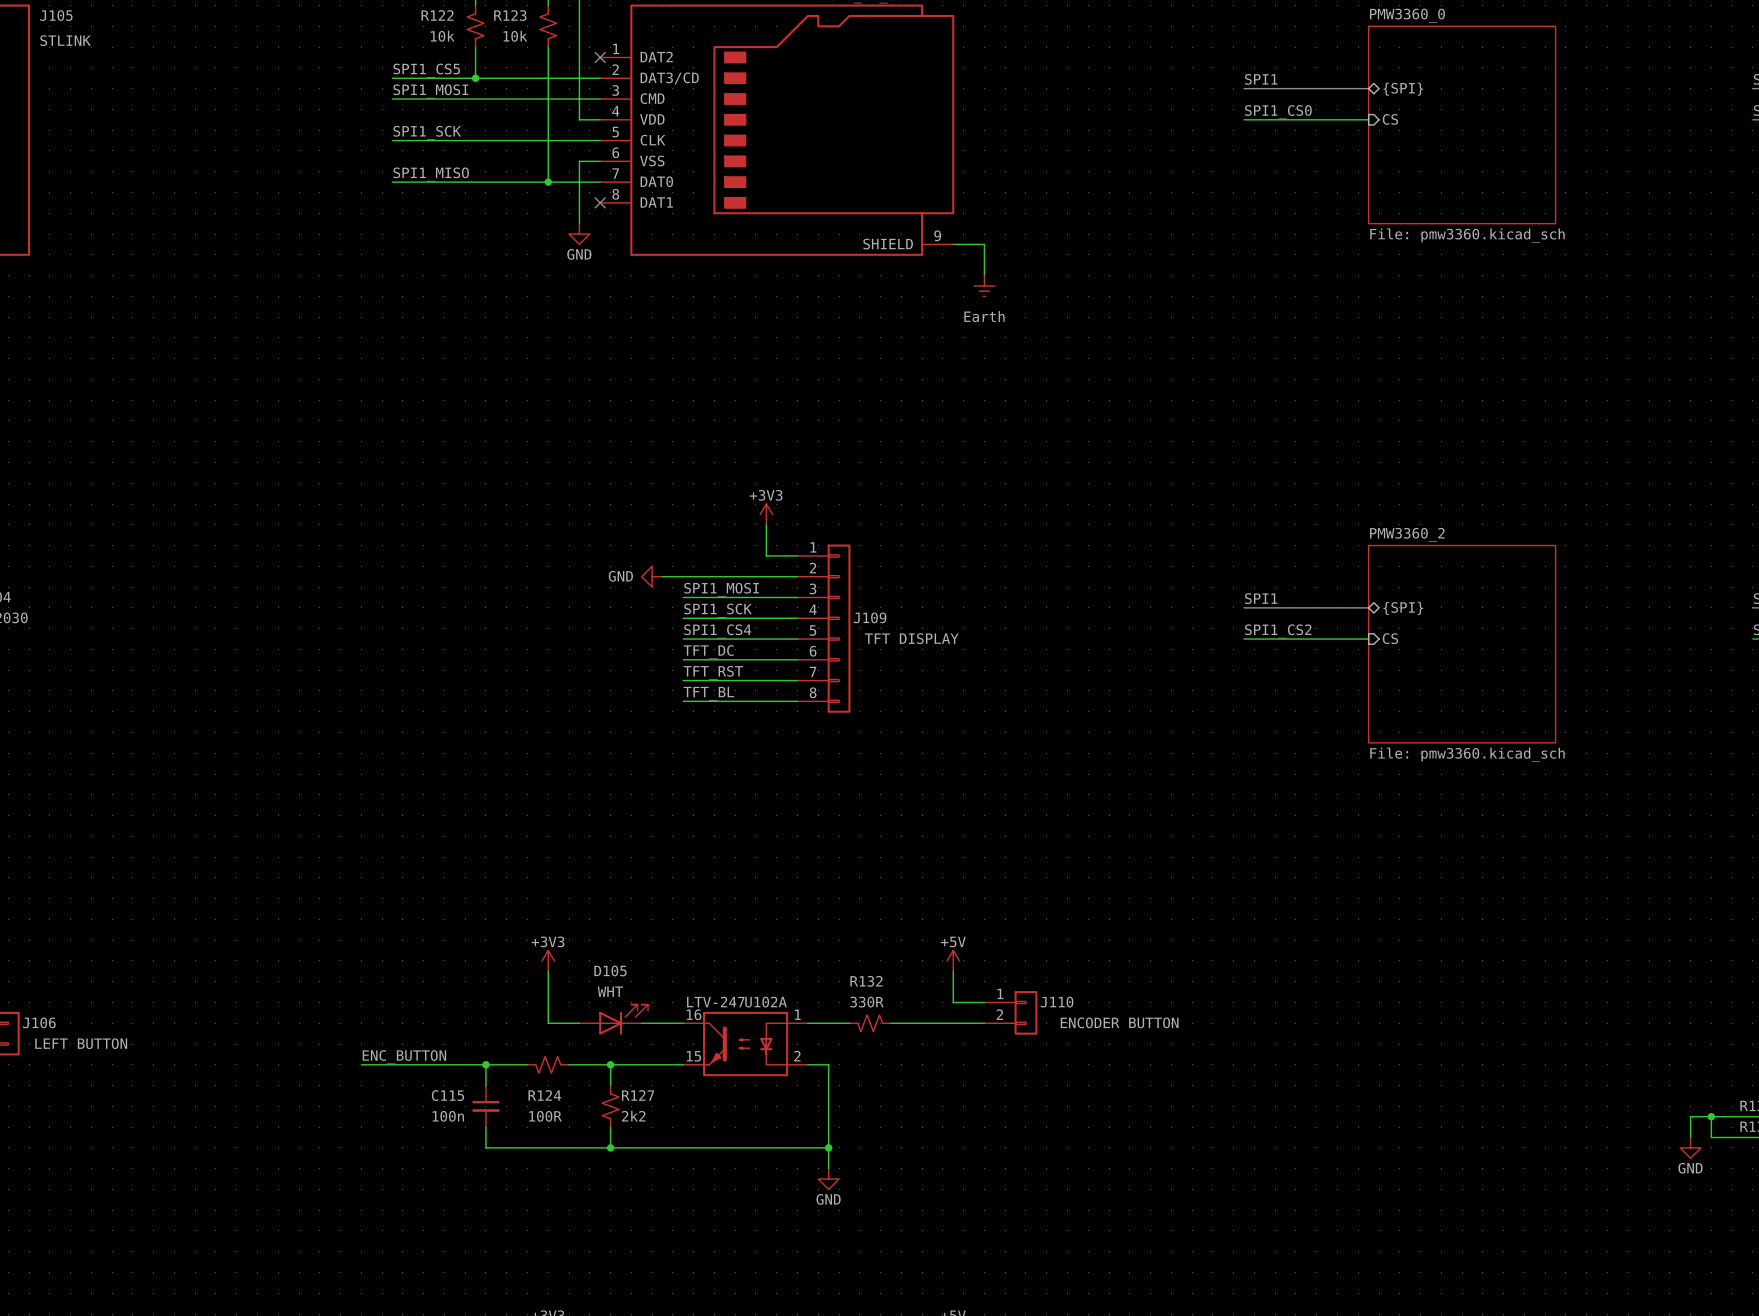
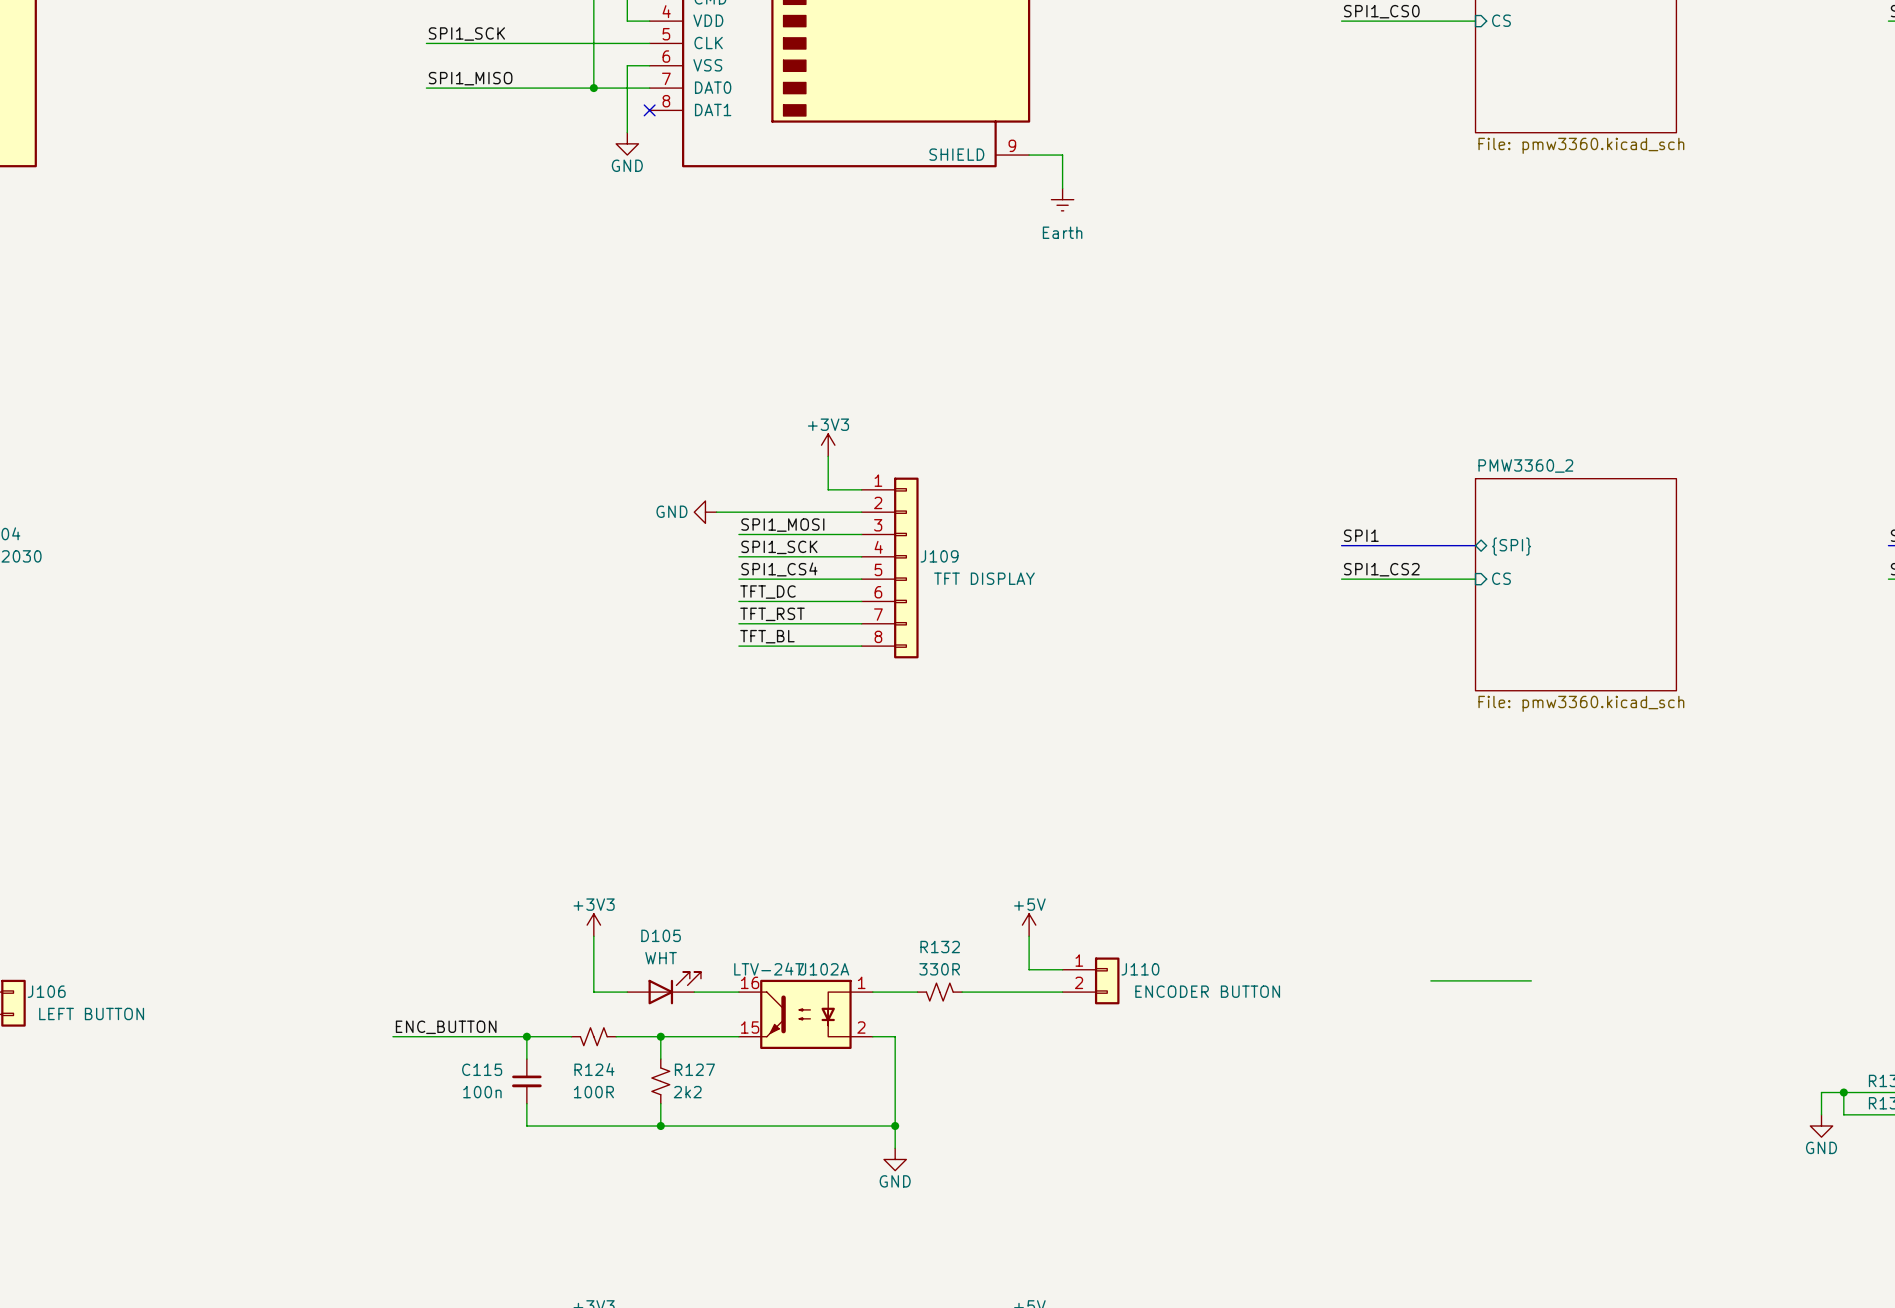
wire: none -> (1430, 980) (1531, 980)

